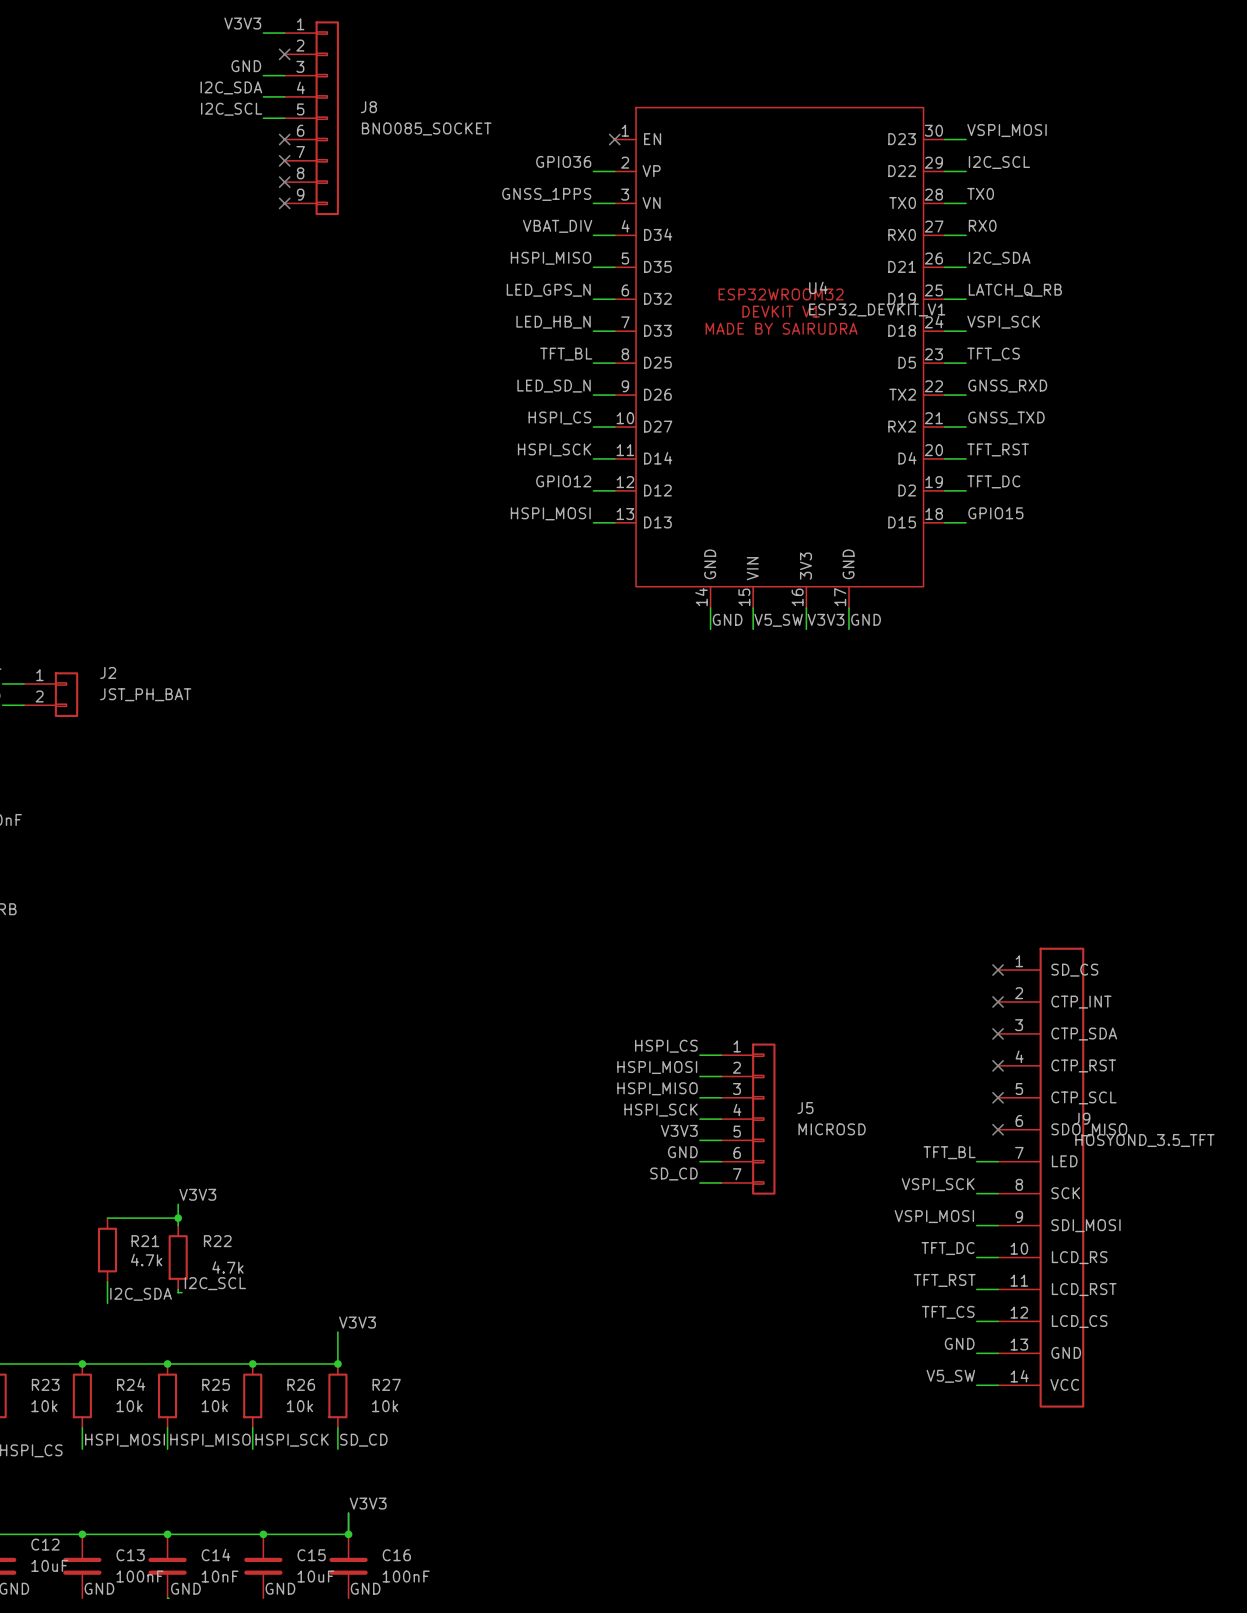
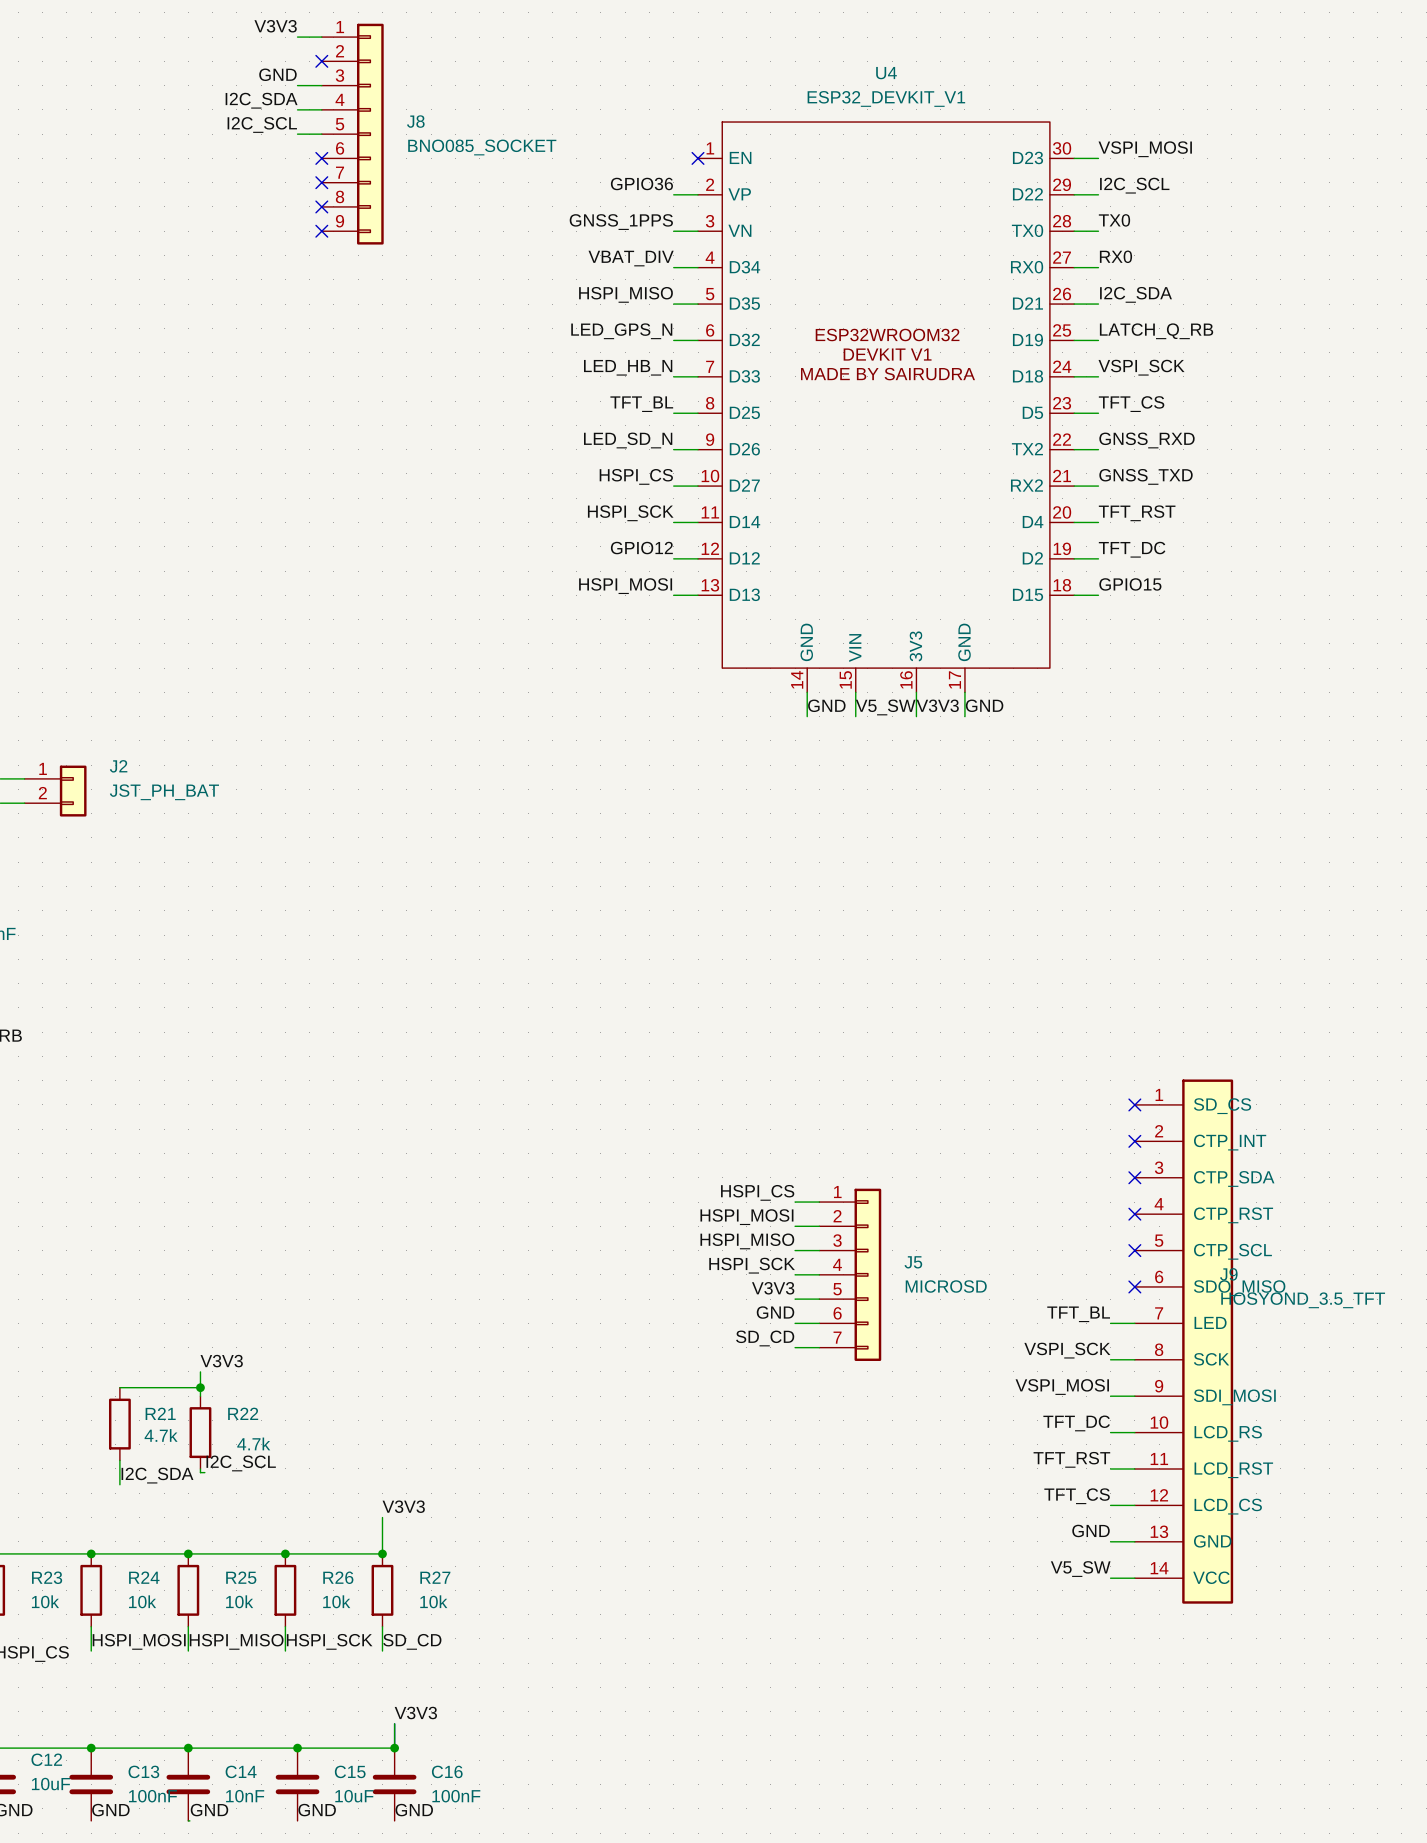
U4 name position: U4 (818, 287) -> U4 (886, 73)
U4 value position: ESP32_DEVKIT_V1 (877, 309) -> ESP32_DEVKIT_V1 (886, 98)

